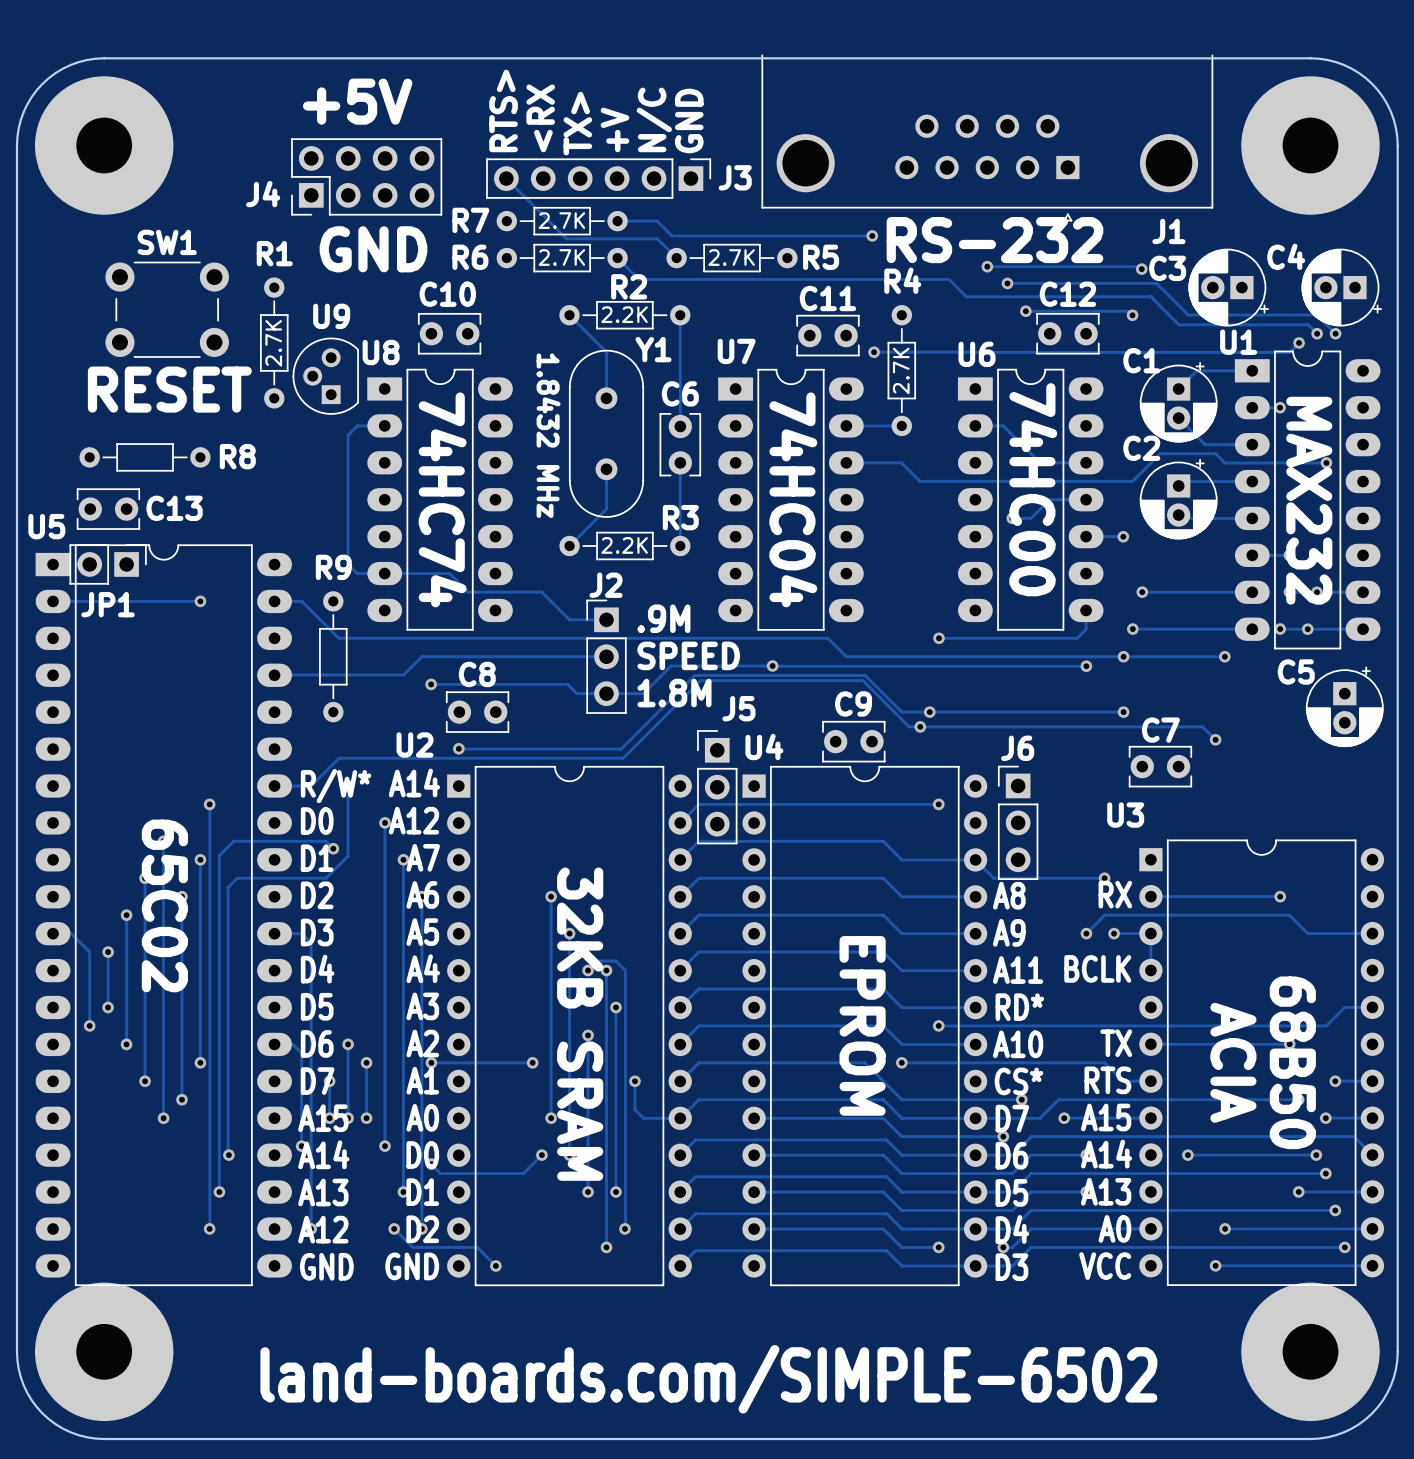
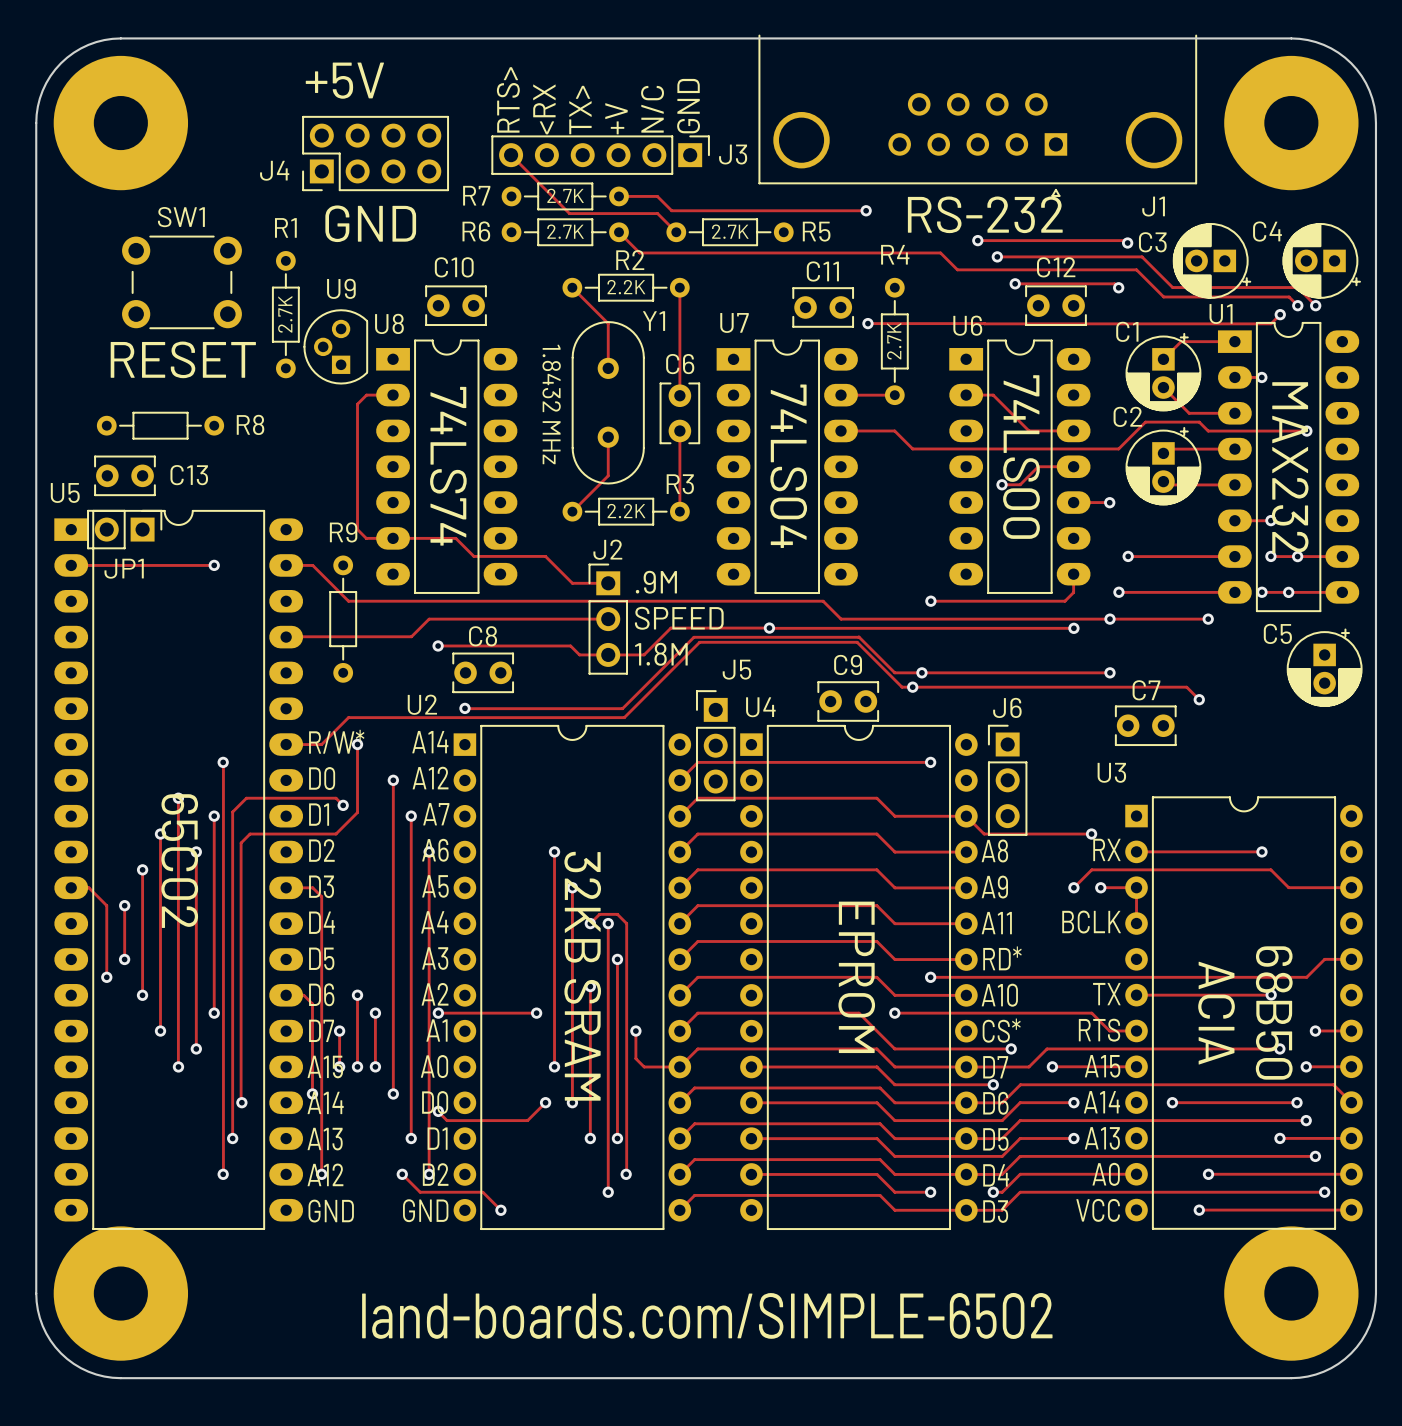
text: 74HC00 (1033, 489) -> 74LS00 (1021, 457)
text: 74HC74 (442, 499) -> 74LS74 (448, 466)
text: 74HC04 (793, 499) -> 74LS04 (788, 466)

